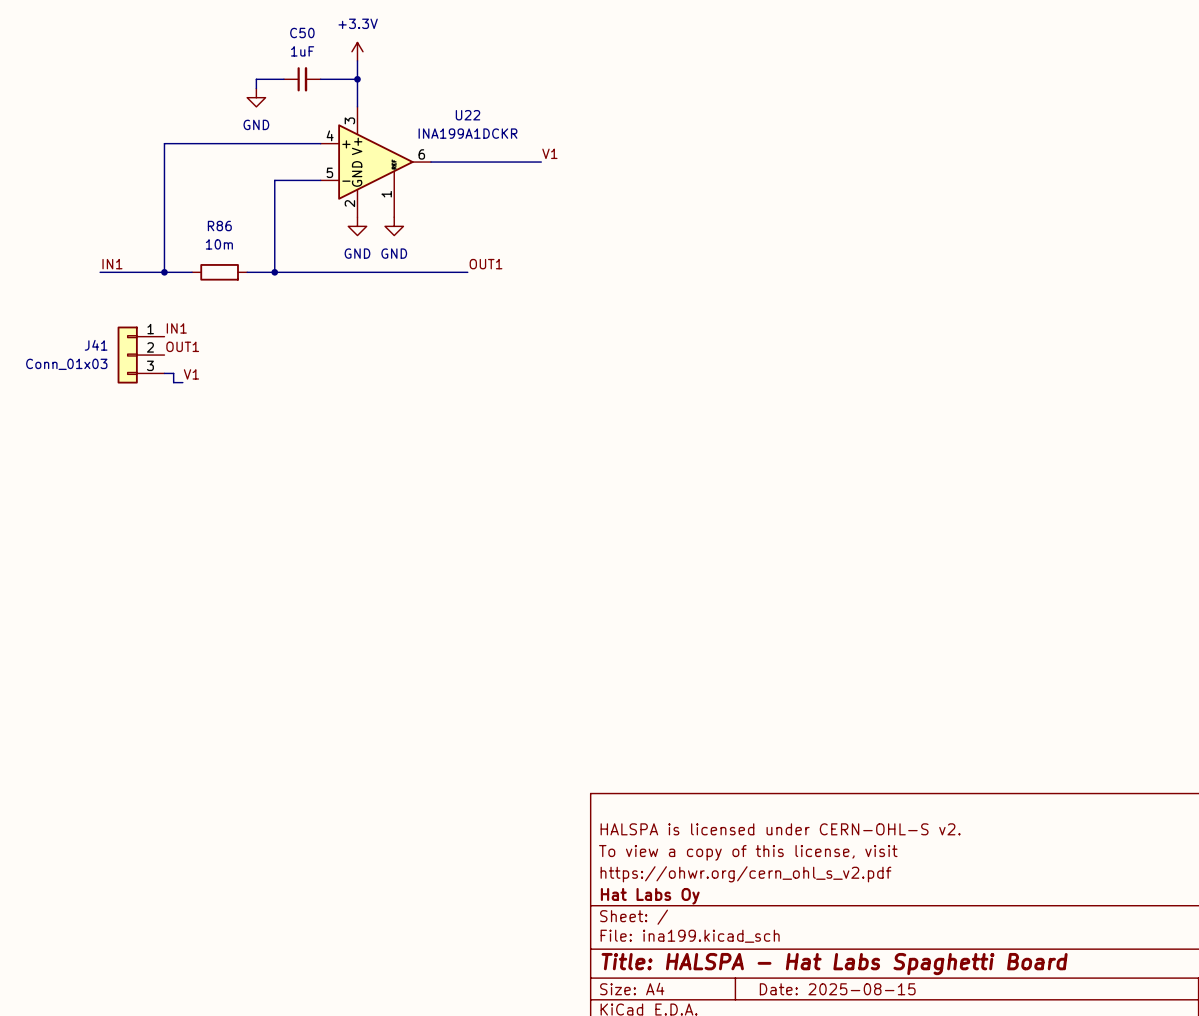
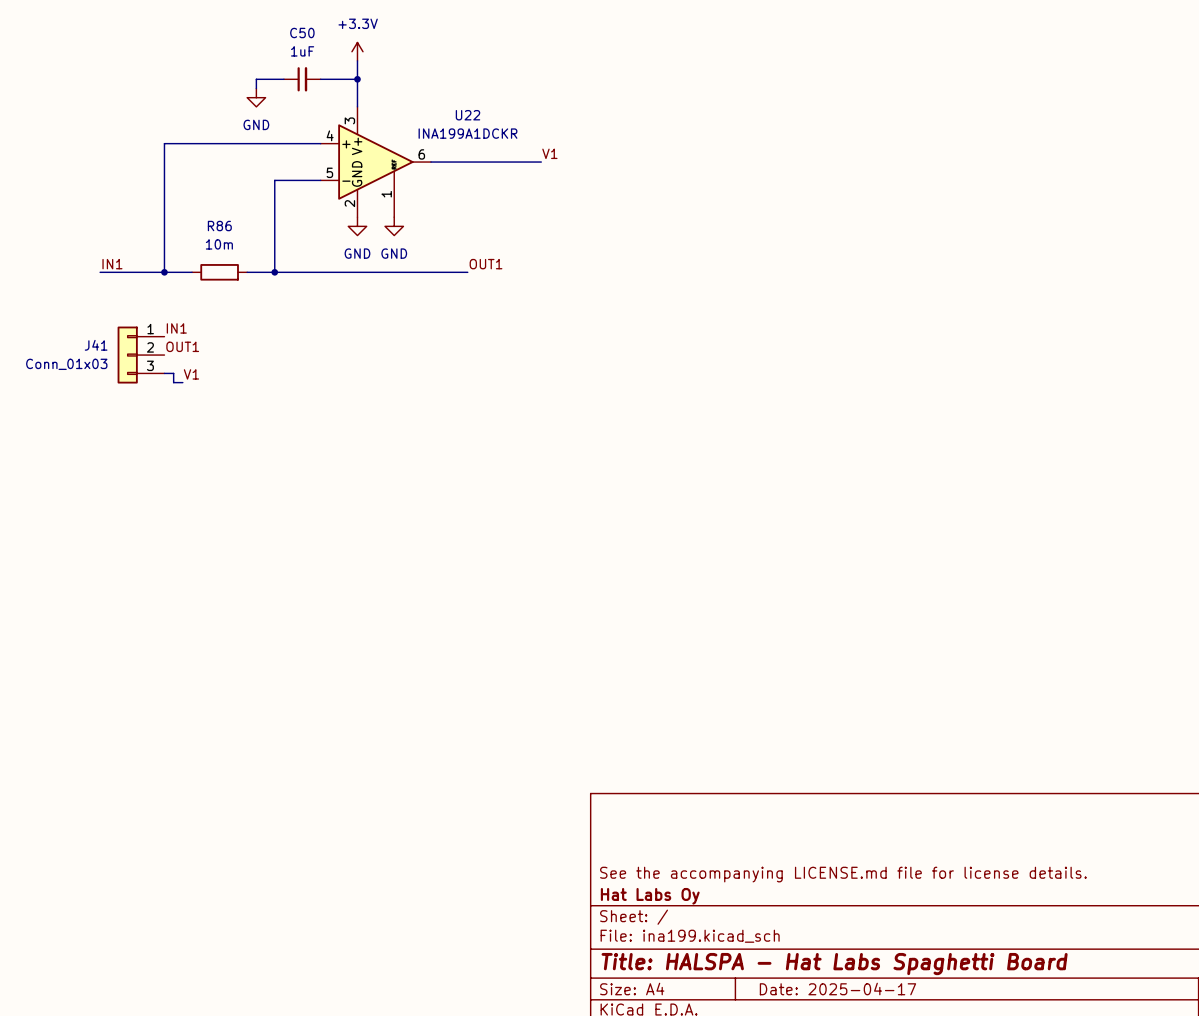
title block: HALSPA is licensed under CERN-OHL-S v2. (780, 829) -> none
title block: To view a copy of this license, visit (748, 852) -> none
title block: https://ohwr.org/cern_ohl_s_v2.pdf (745, 874) -> See the accompanying LICENSE.md file for license details. (843, 874)
title block: Date: 2025-08-15 (837, 989) -> Date: 2025-04-17 (837, 989)

